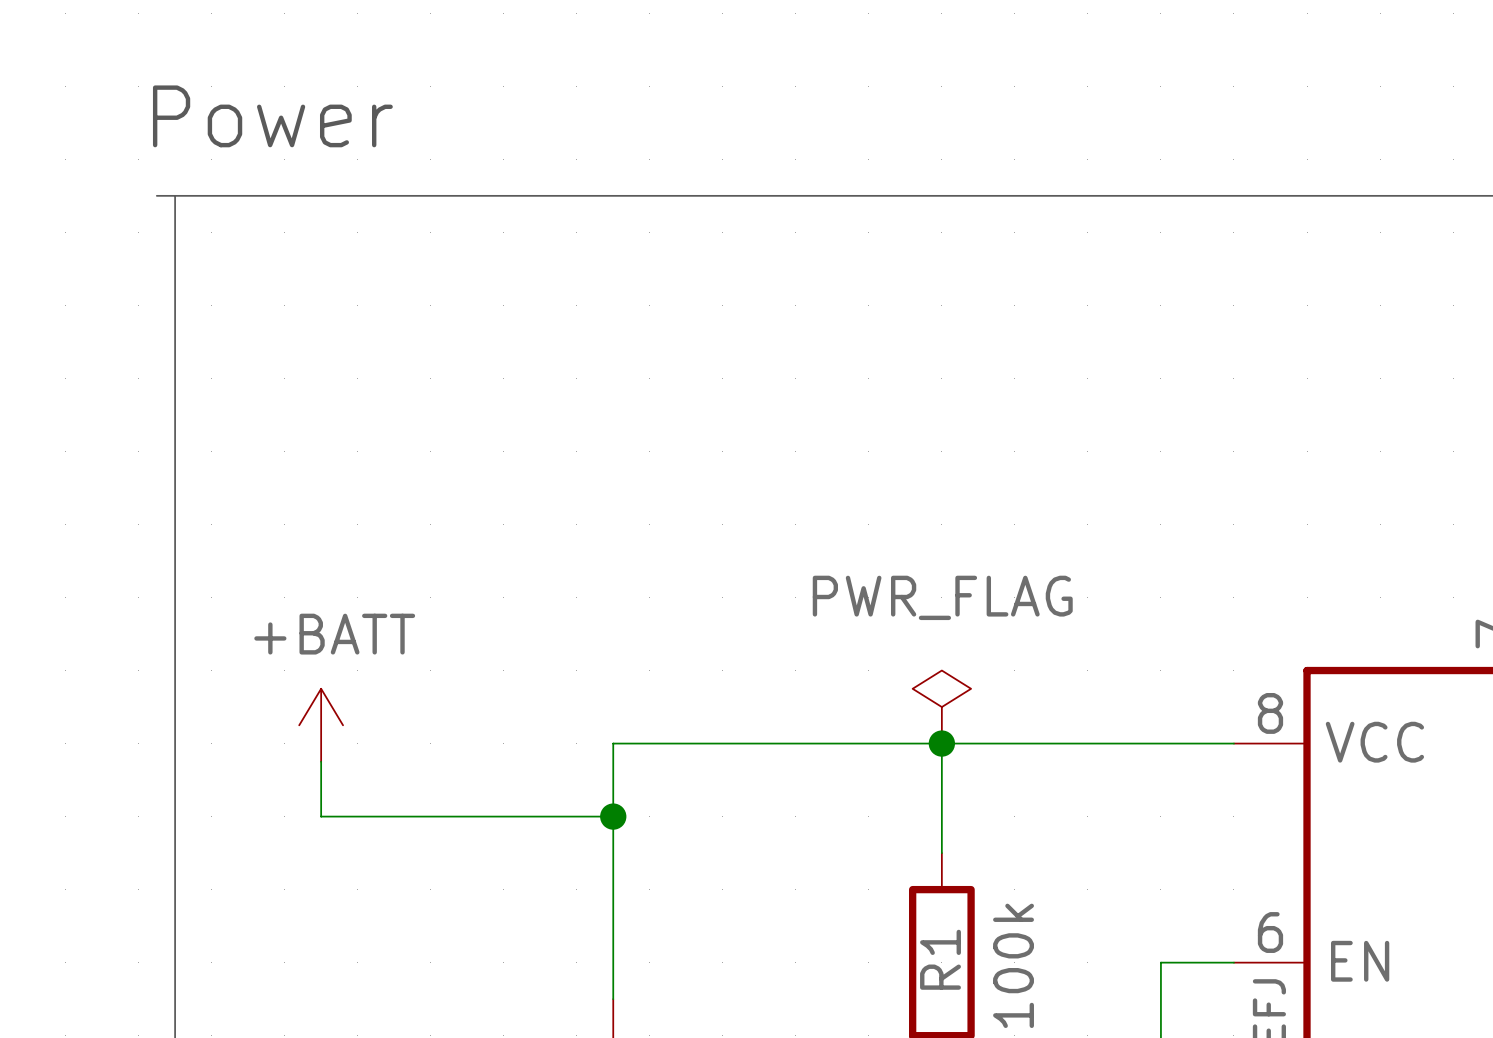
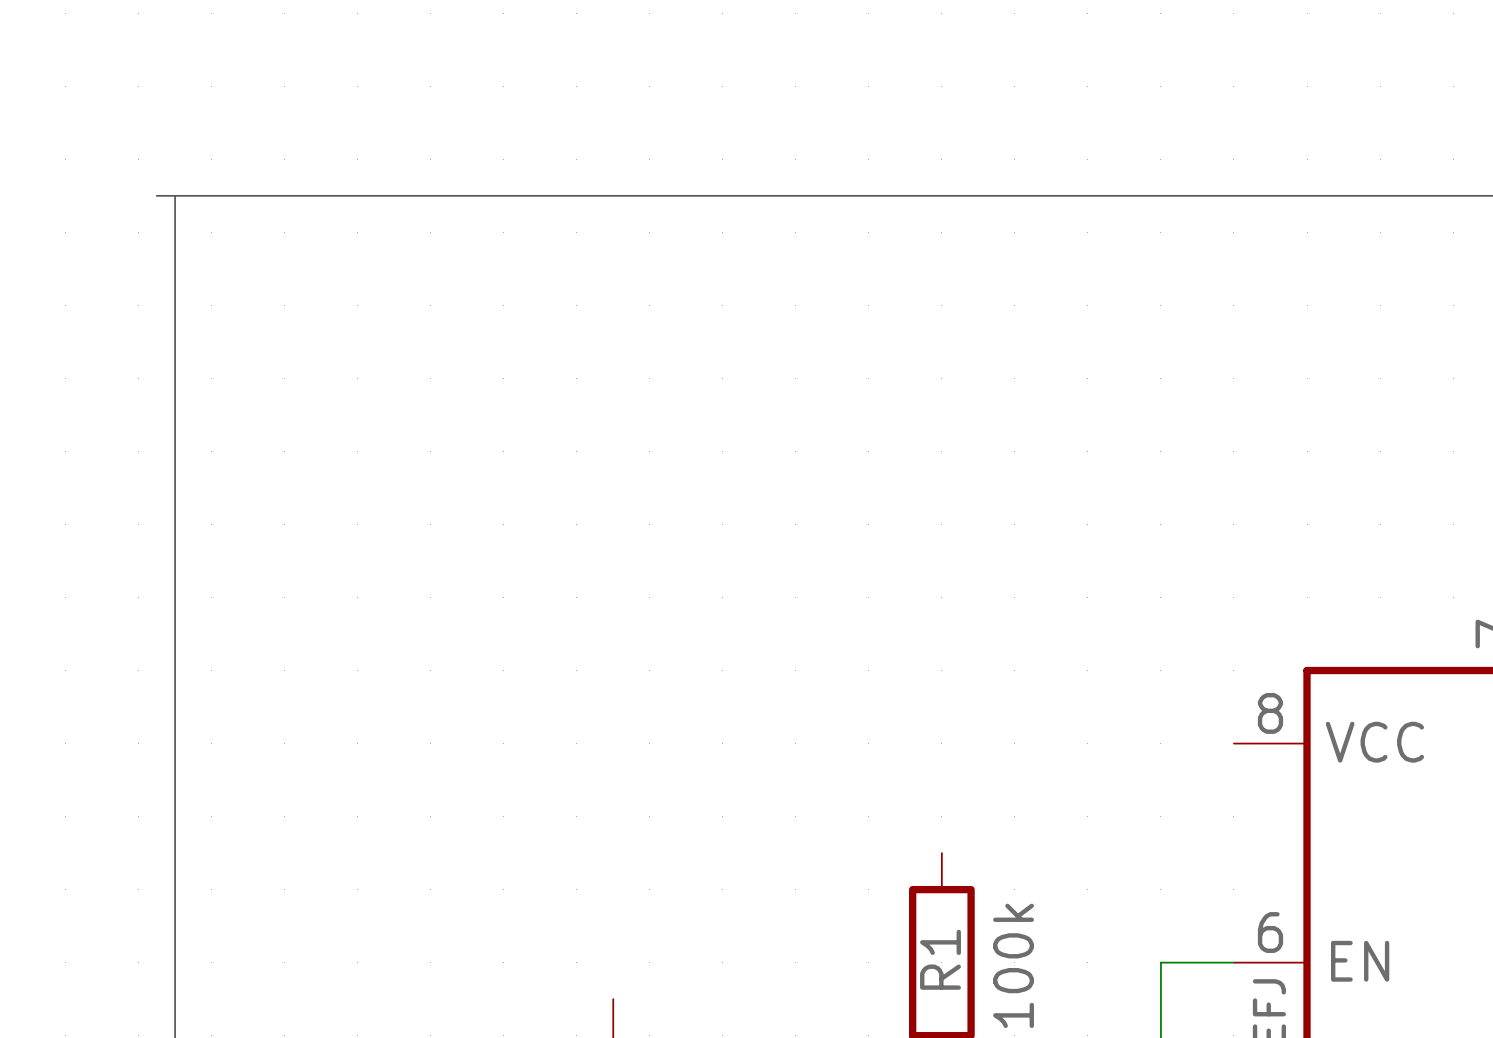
text: Power (272, 116) -> none
power symbol: PWR_FLAG (941, 707) -> none
power symbol: +BATT (321, 725) -> none
wire: (941, 743) (941, 853) -> none
junction: (941, 743) -> none
wire: (1233, 743) (613, 743) (613, 999) -> none
wire: (321, 761) (321, 816) (613, 816) -> none
junction: (613, 816) -> none

